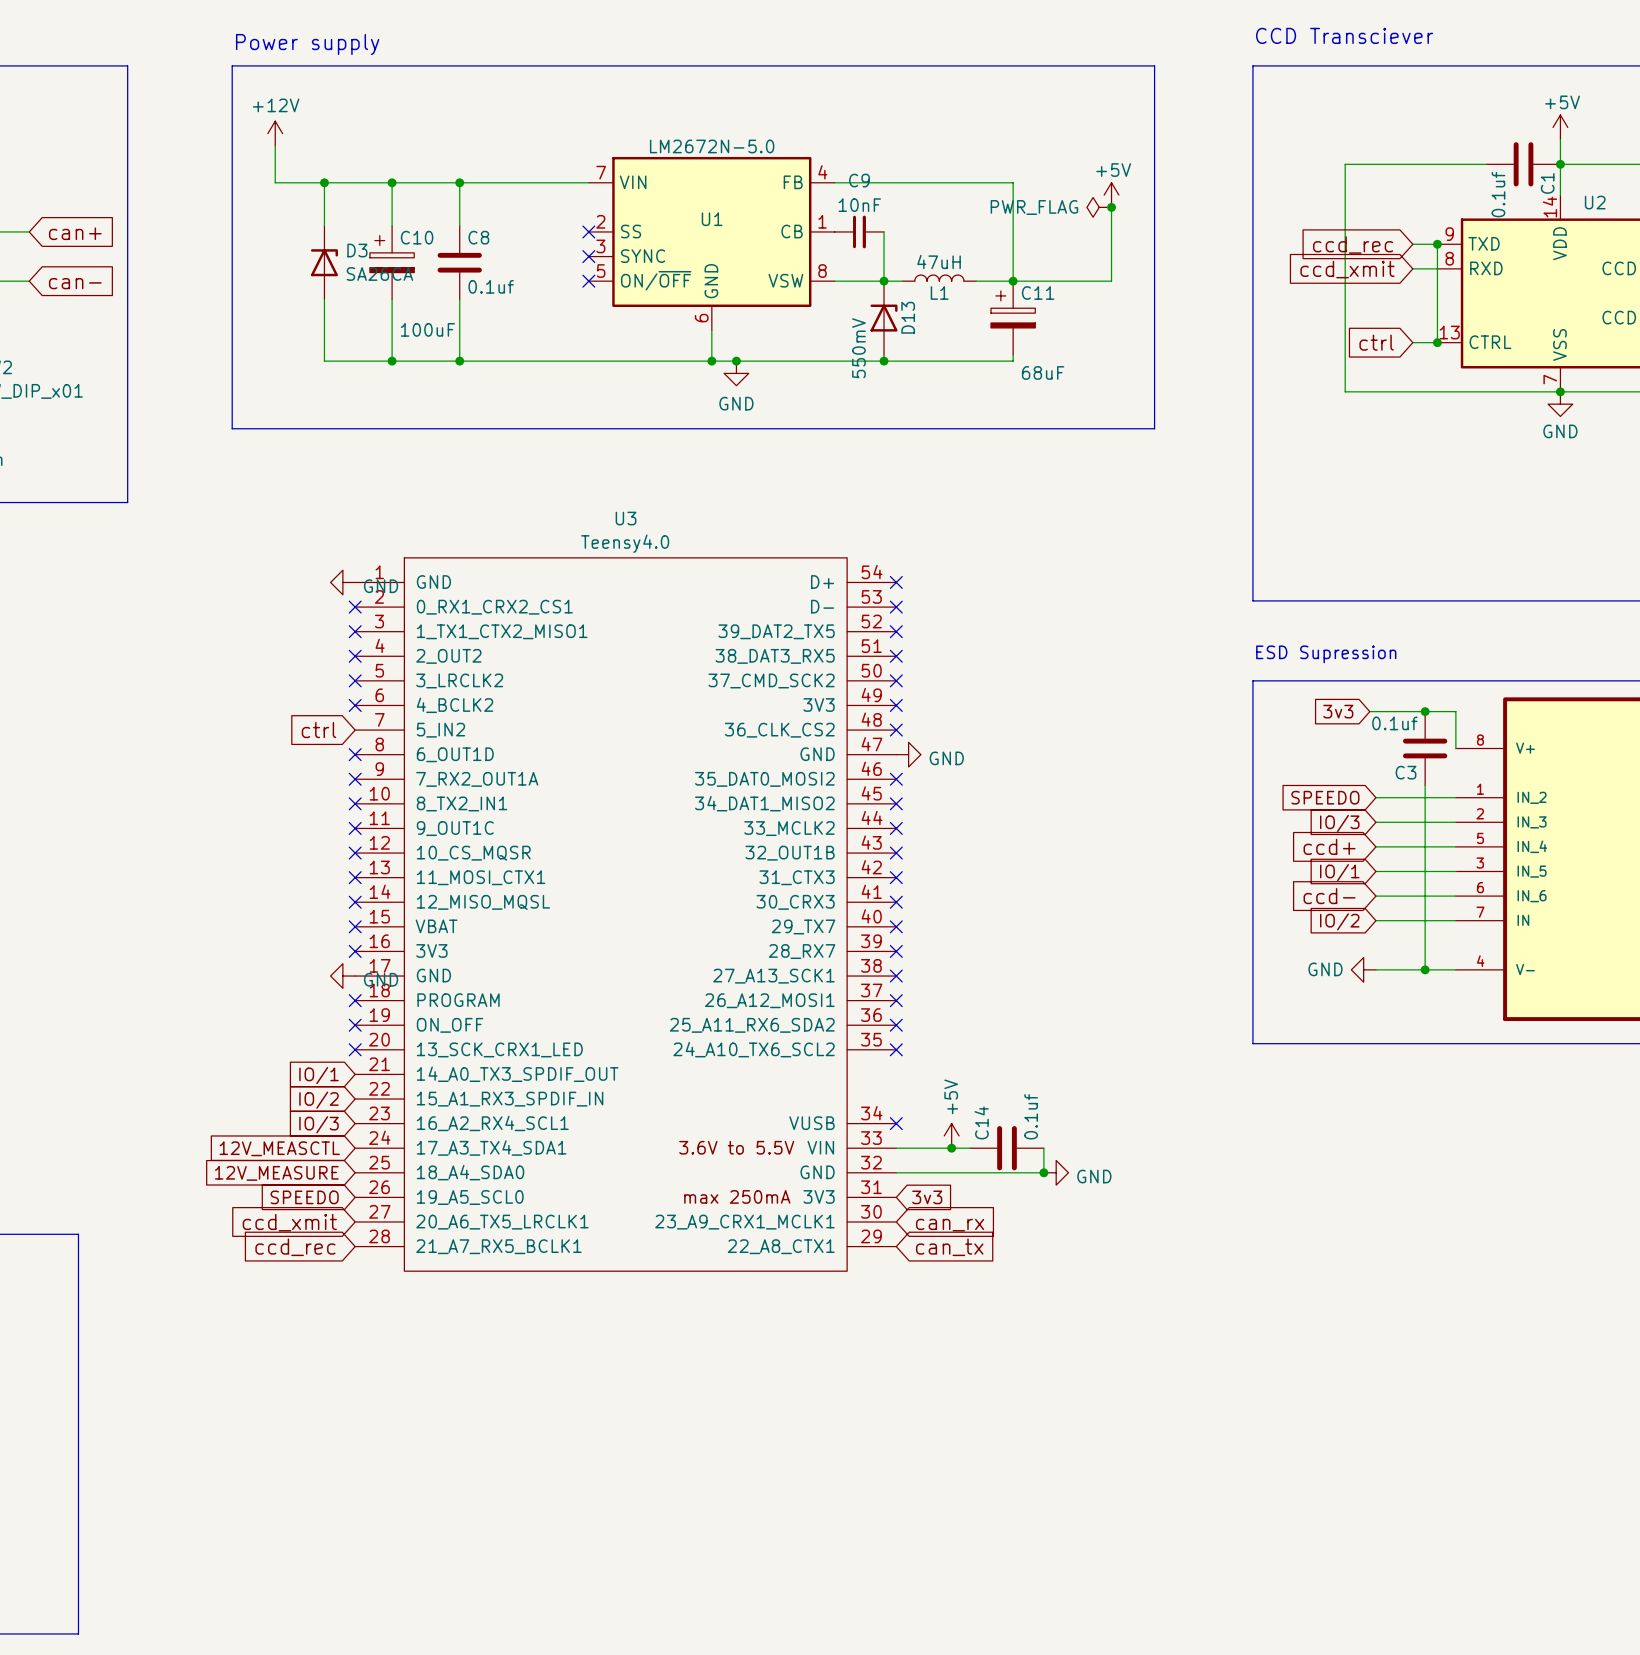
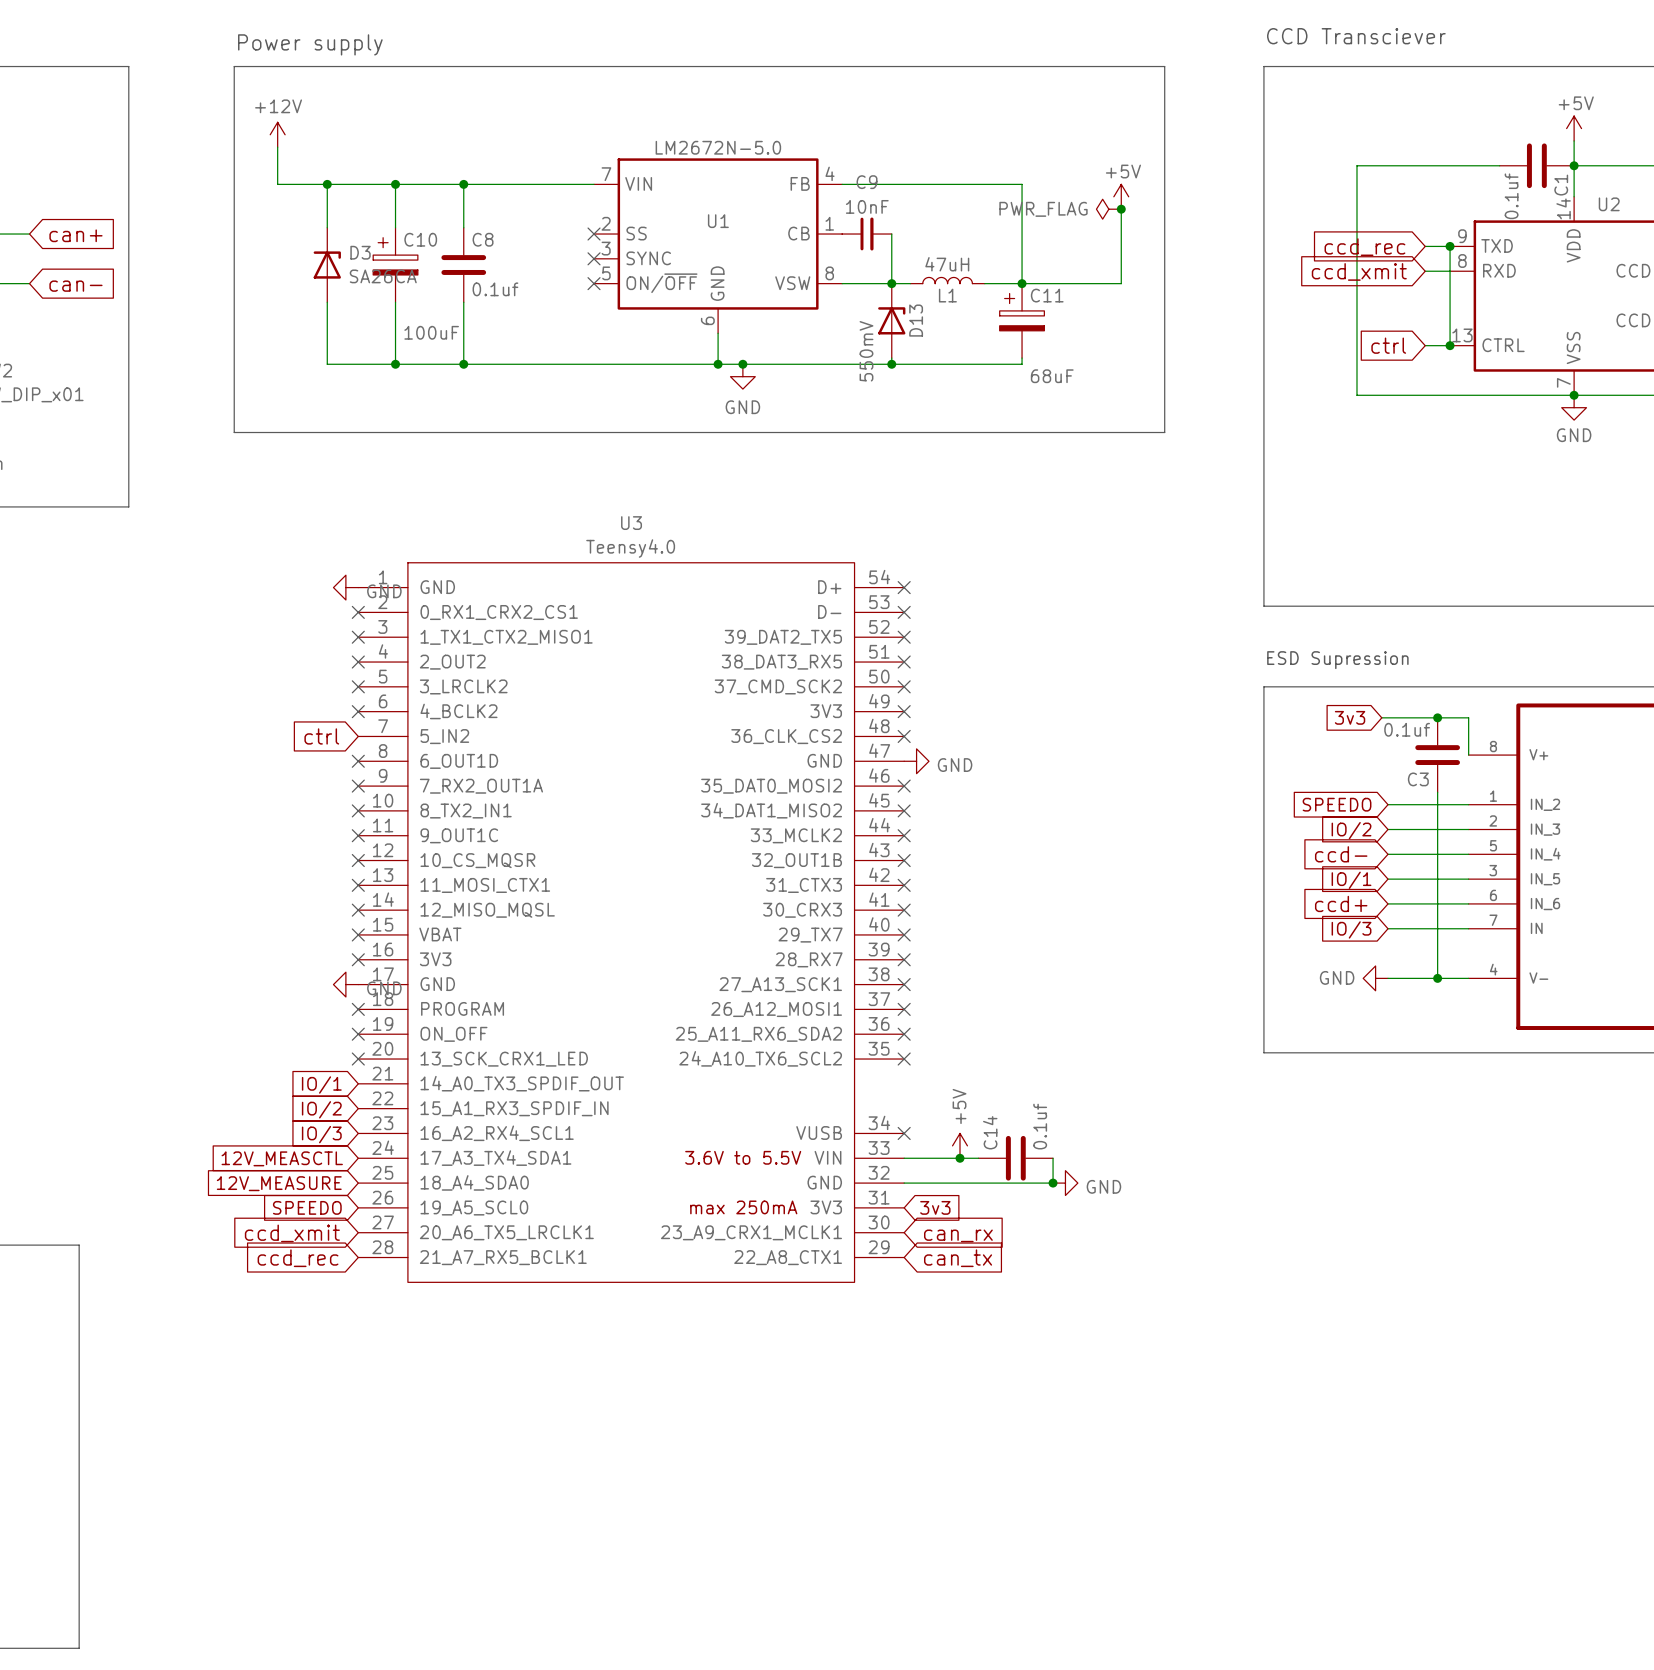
global label: IO/3 (1339, 823) -> IO/2 (1351, 830)
global label: ccd+ (1329, 846) -> ccd- (1341, 854)
global label: ccd- (1329, 896) -> ccd+ (1341, 903)
global label: IO/2 (1339, 921) -> IO/3 (1351, 929)

